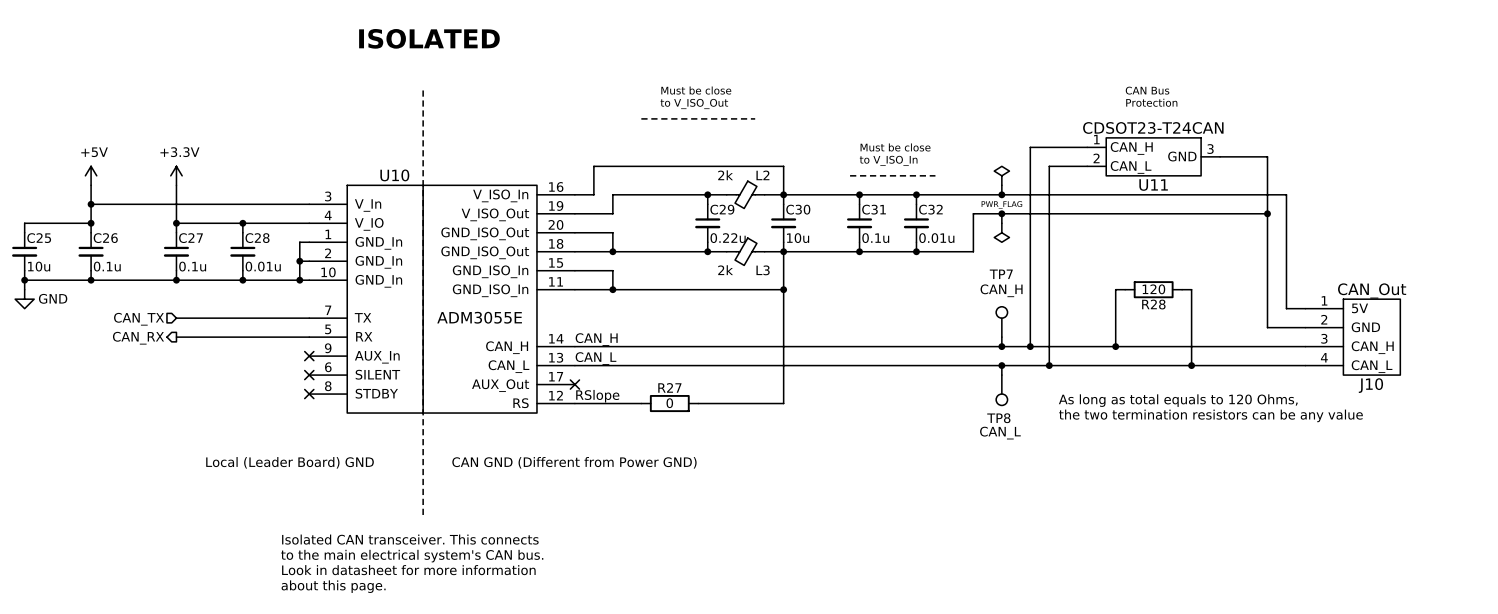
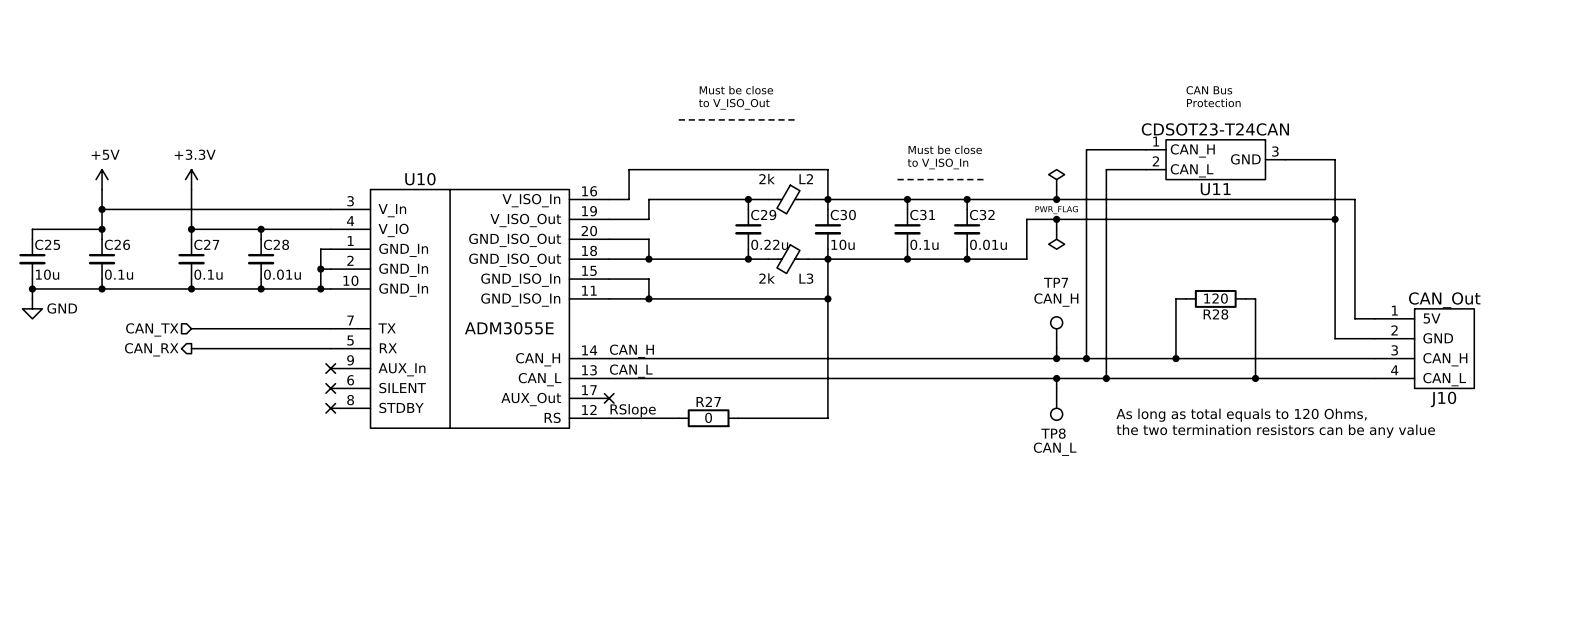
text: ISOLATED (429, 38) -> none
line: (423, 90) (423, 517) -> none
text: Local (Leader Board) GND (290, 462) -> none
text: CAN GND (Different from Power GND) (574, 462) -> none
text: Isolated CAN transceiver. This connects (410, 539) -> none
text: to the main electrical system's CAN bus. (412, 556) -> none
text: Look in datasheet for more information (408, 570) -> none
text: about this page. (333, 586) -> none

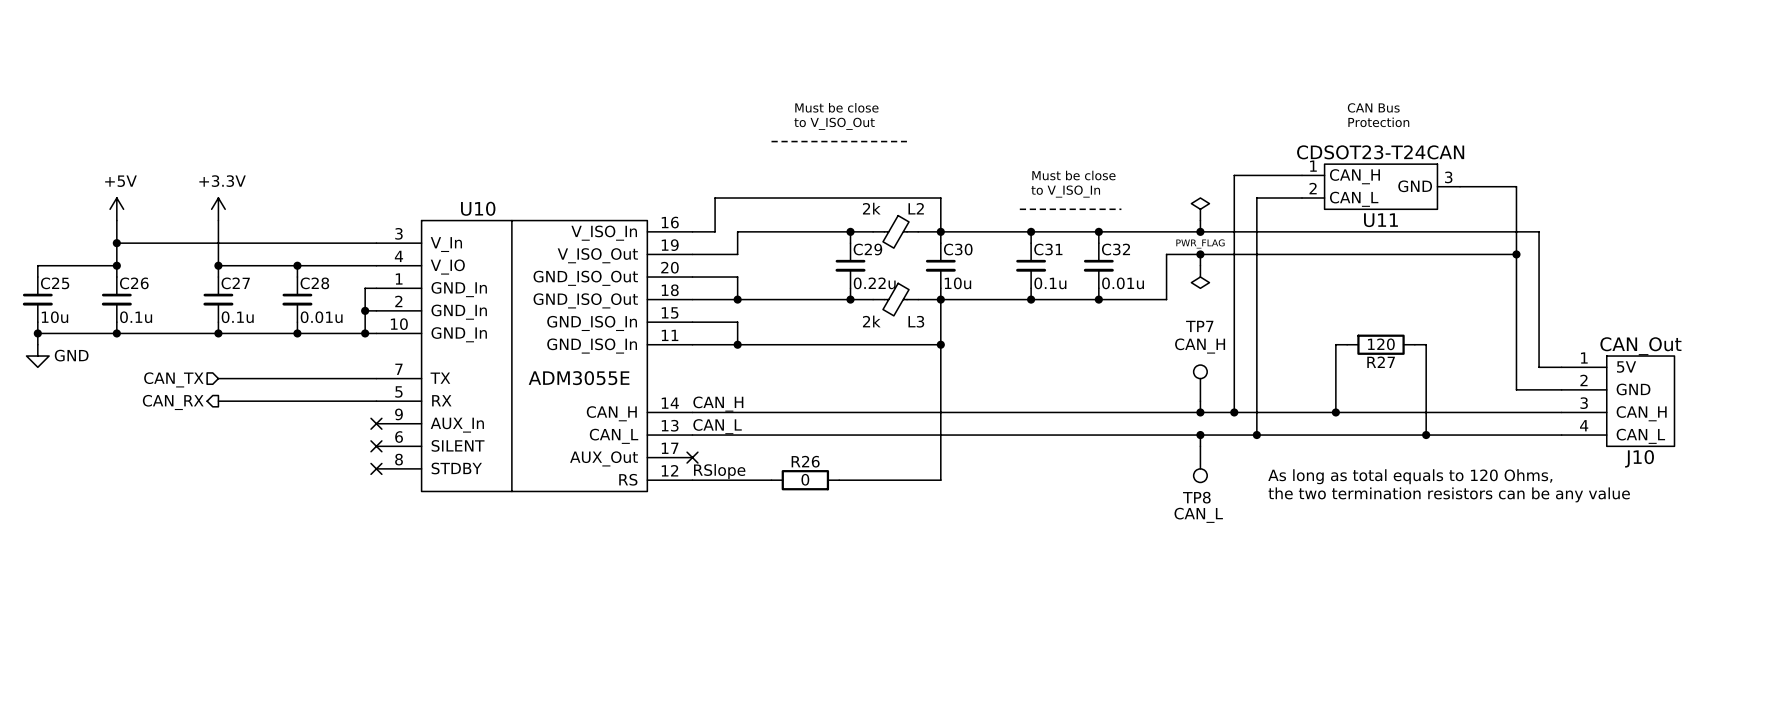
R28 name: R28 (1215, 314) -> R27 (1381, 362)
R27 name: R27 (708, 401) -> R26 (805, 461)

